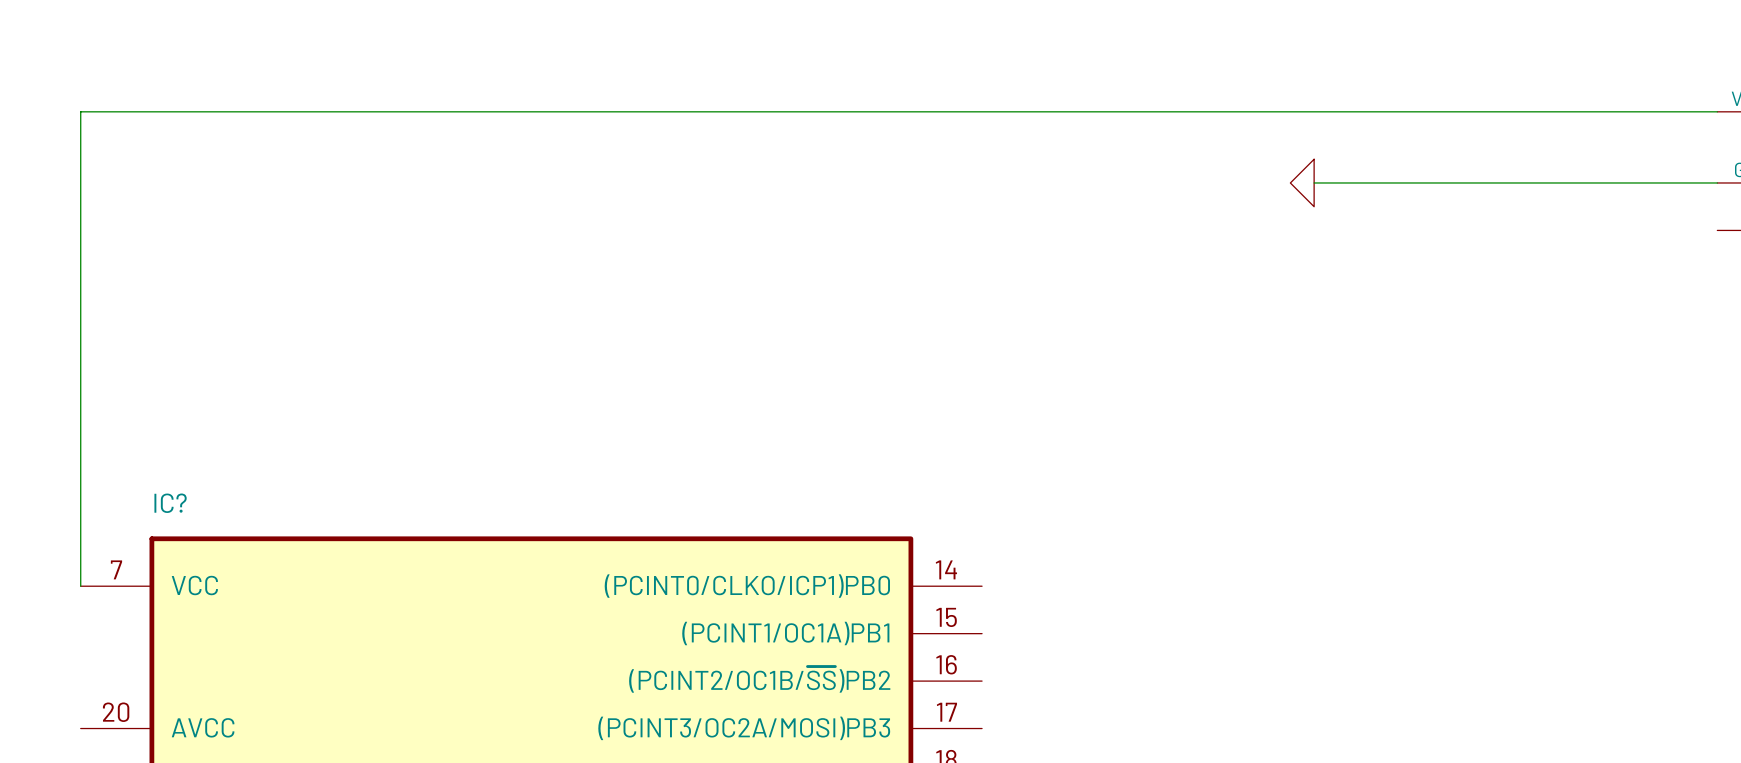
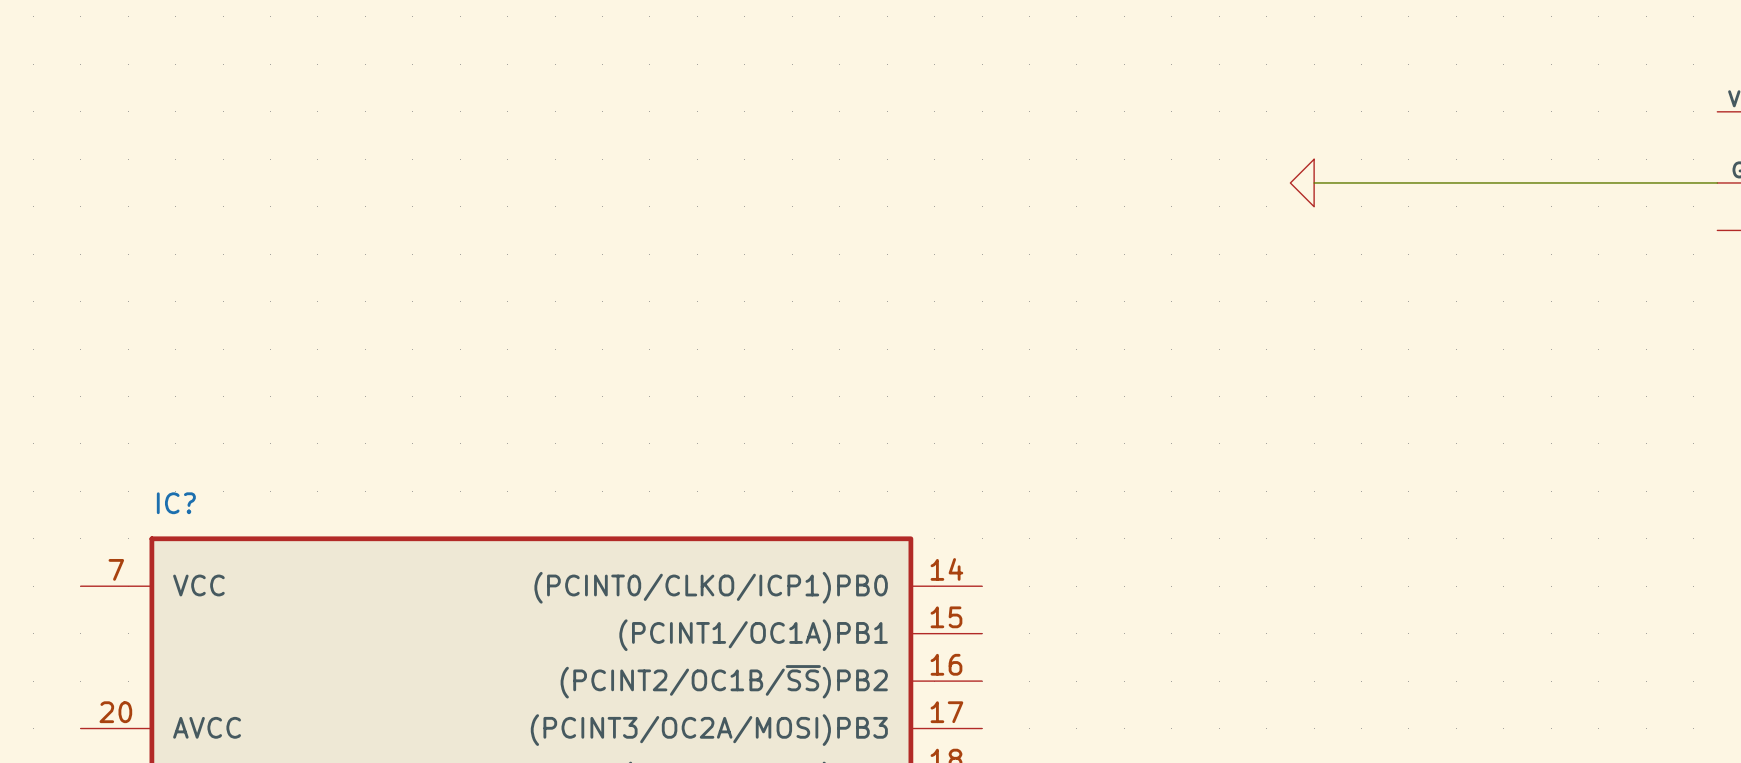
wire: (1717, 111) (80, 111) (80, 586) -> none

